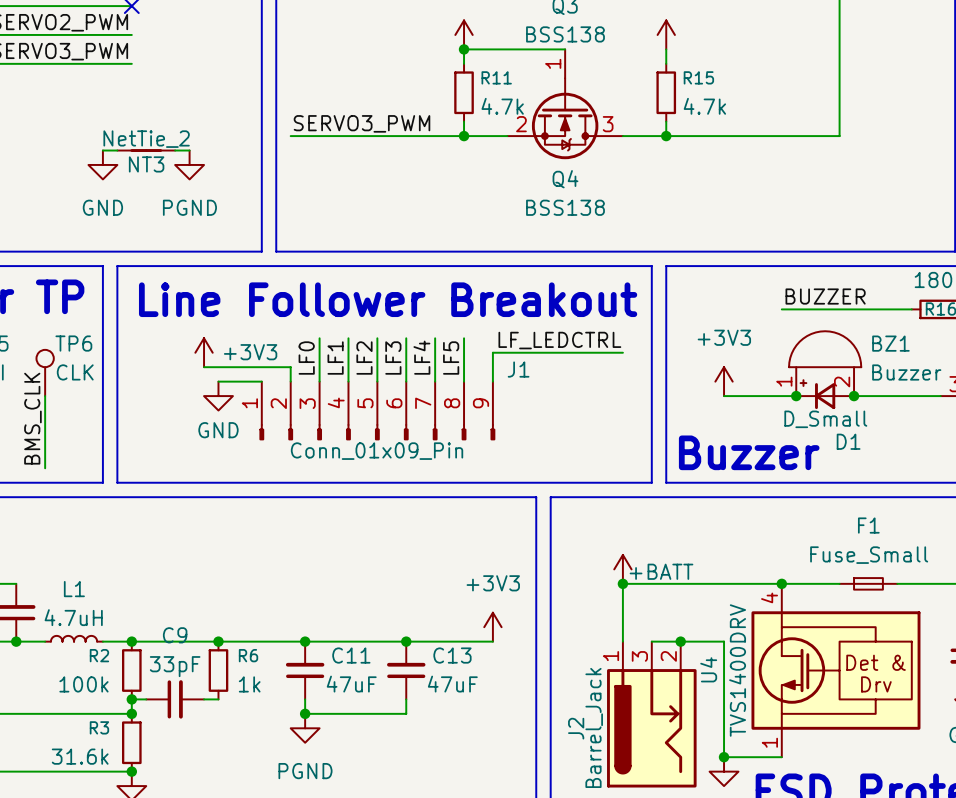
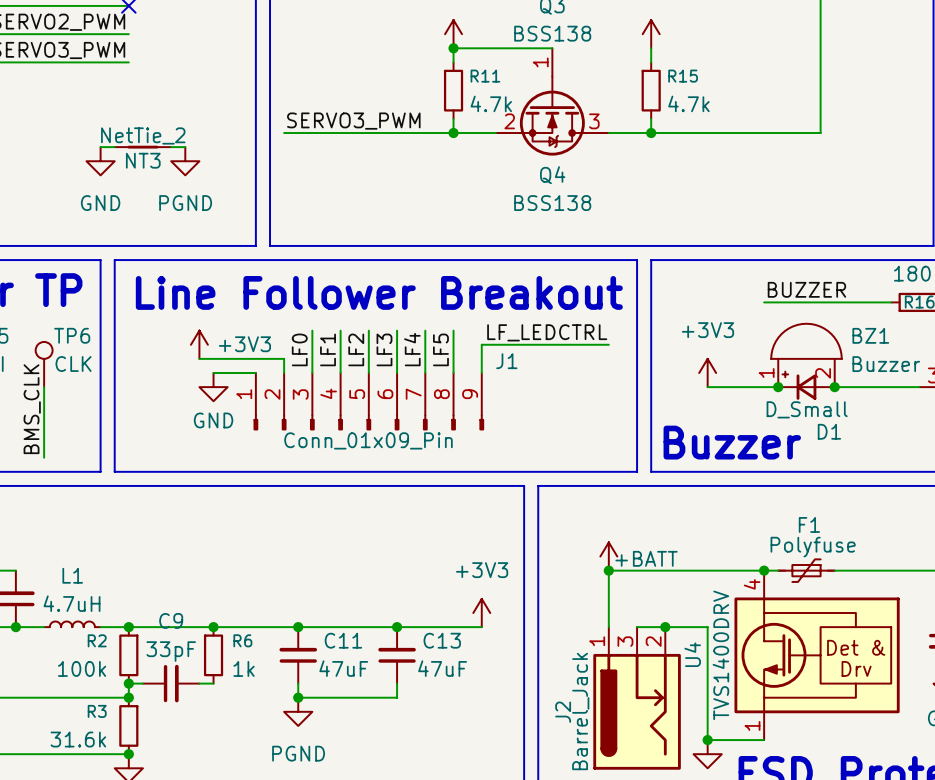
F1 value: Fuse_Small (869, 555) -> Polyfuse (813, 547)
F1 symbol: [839, 578, 898, 590] -> [778, 559, 835, 582]

